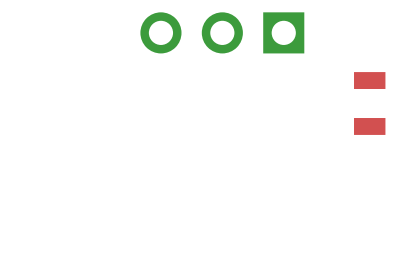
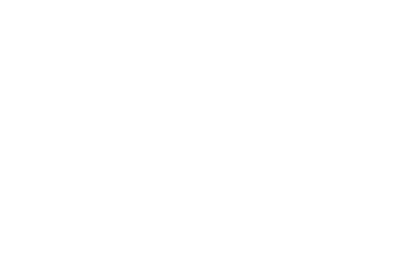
part: (222, 32) -> none
part: (369, 103) -> none

